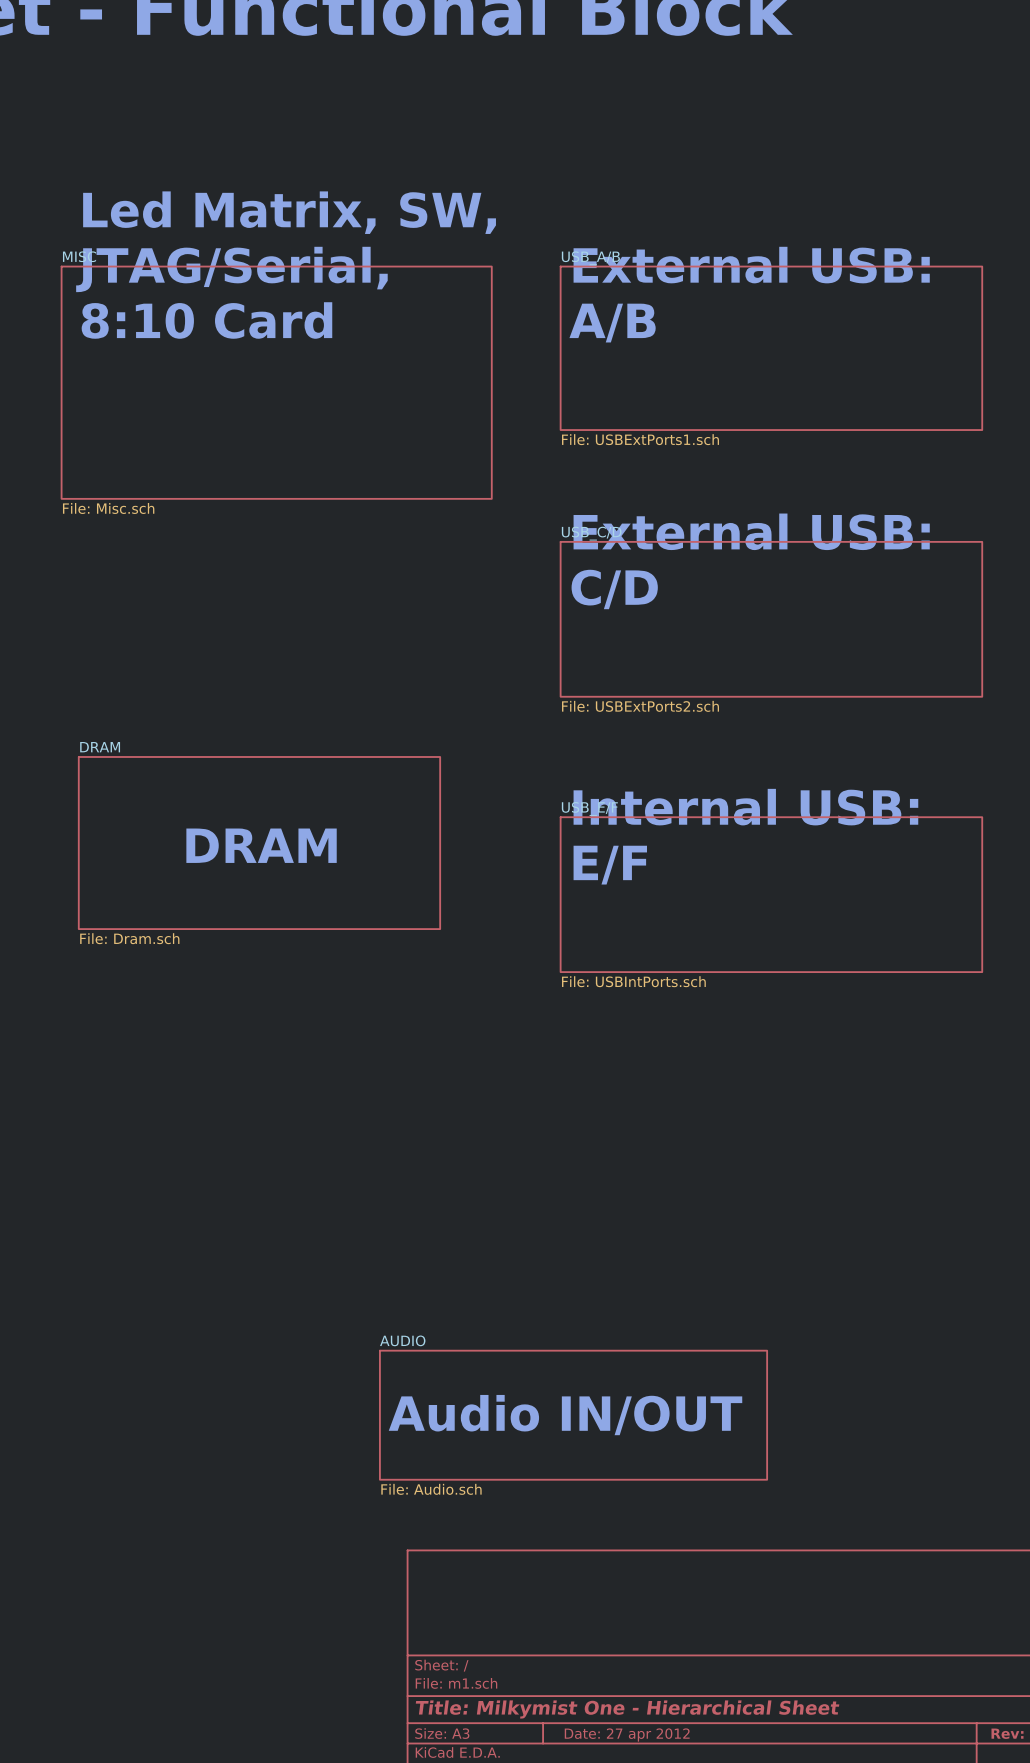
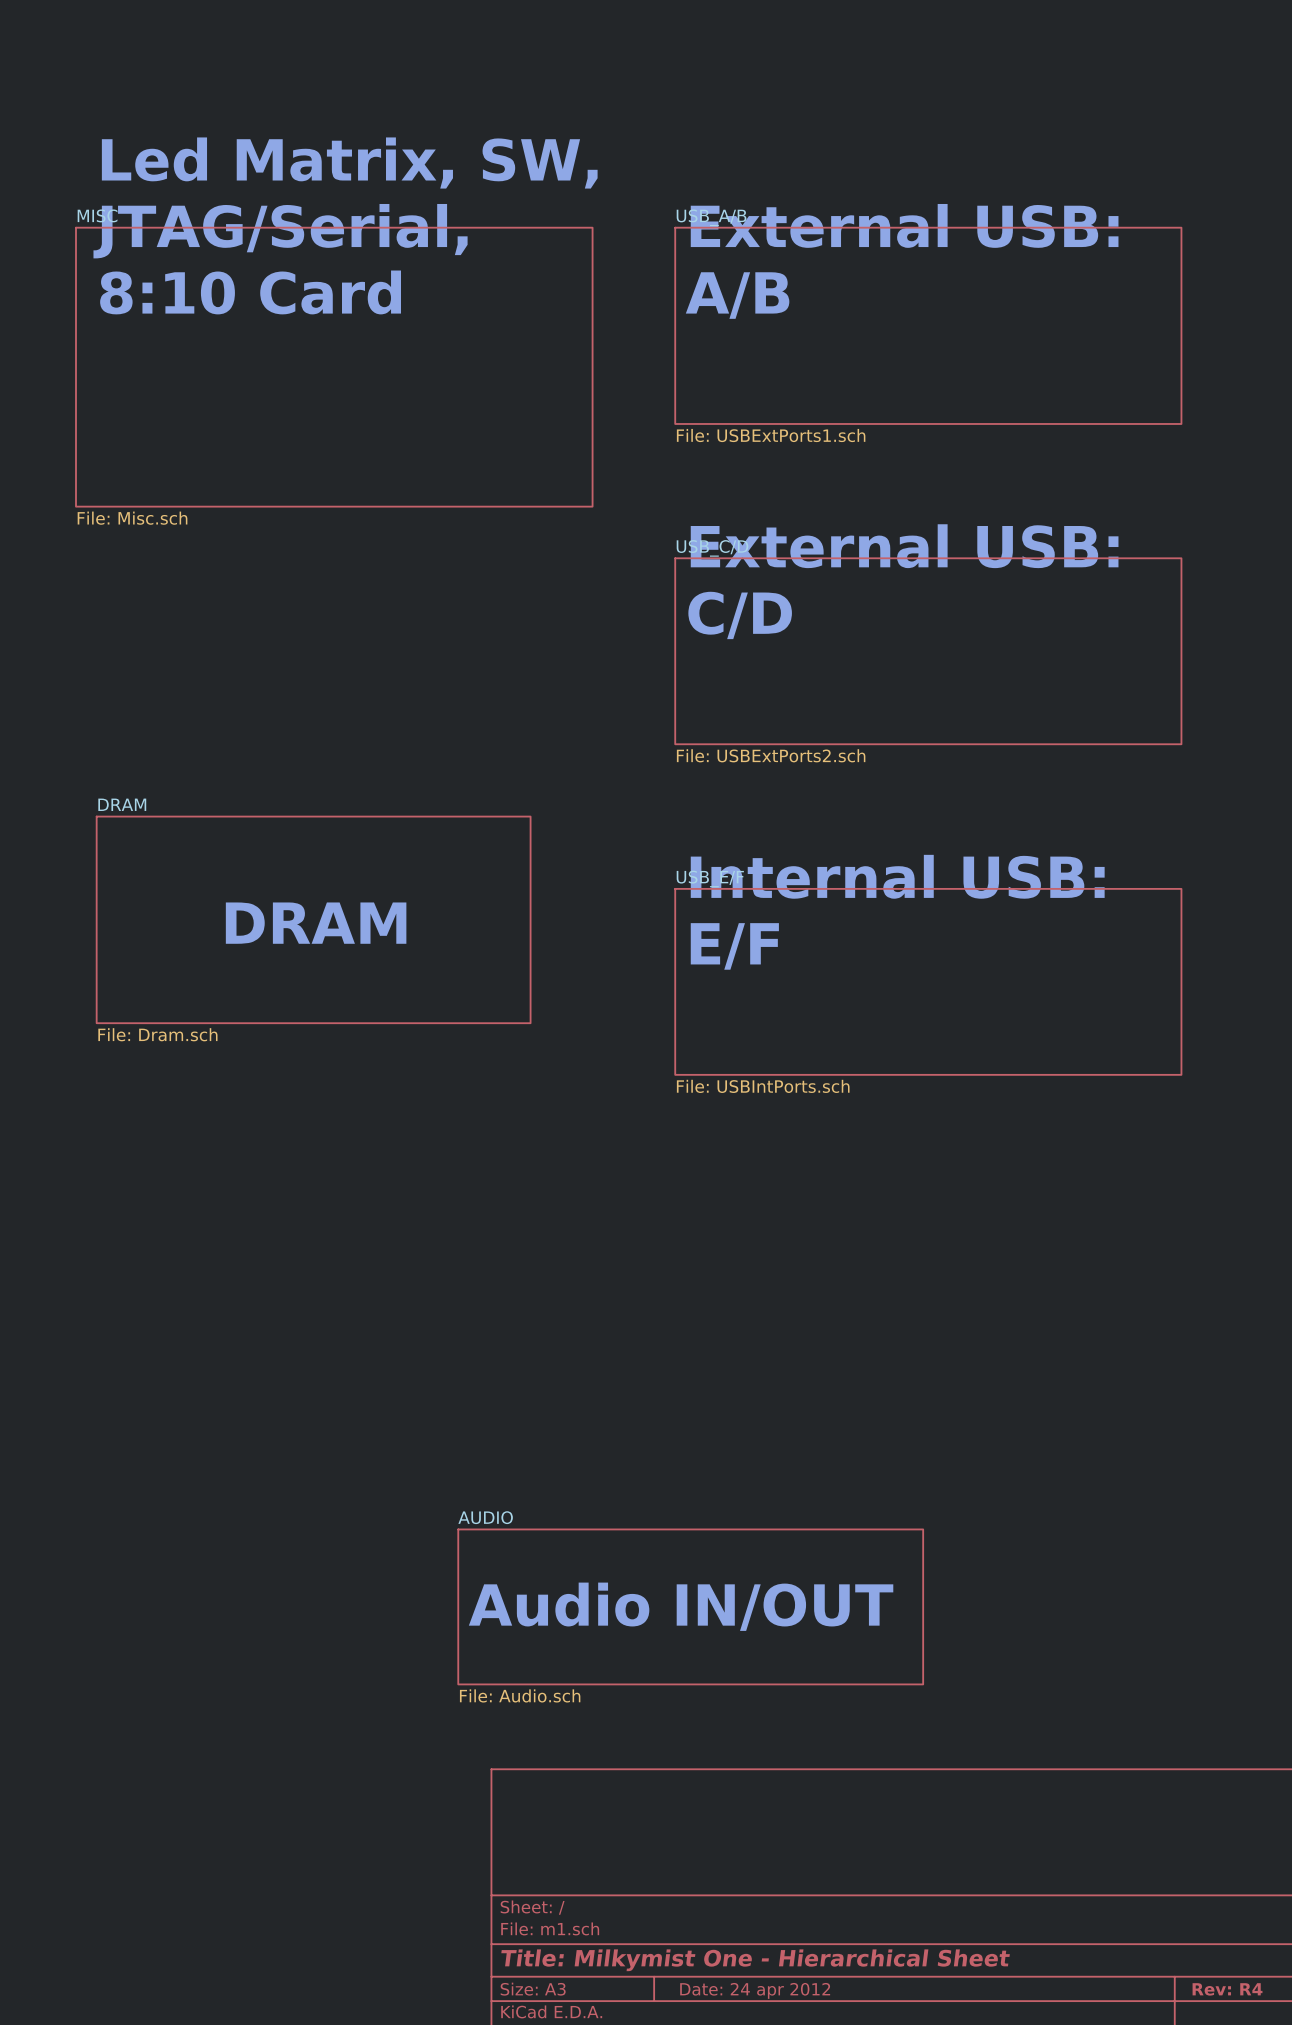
title block: Date: 27 apr 2012 (627, 1735) -> Date: 24 apr 2012 (755, 1990)

